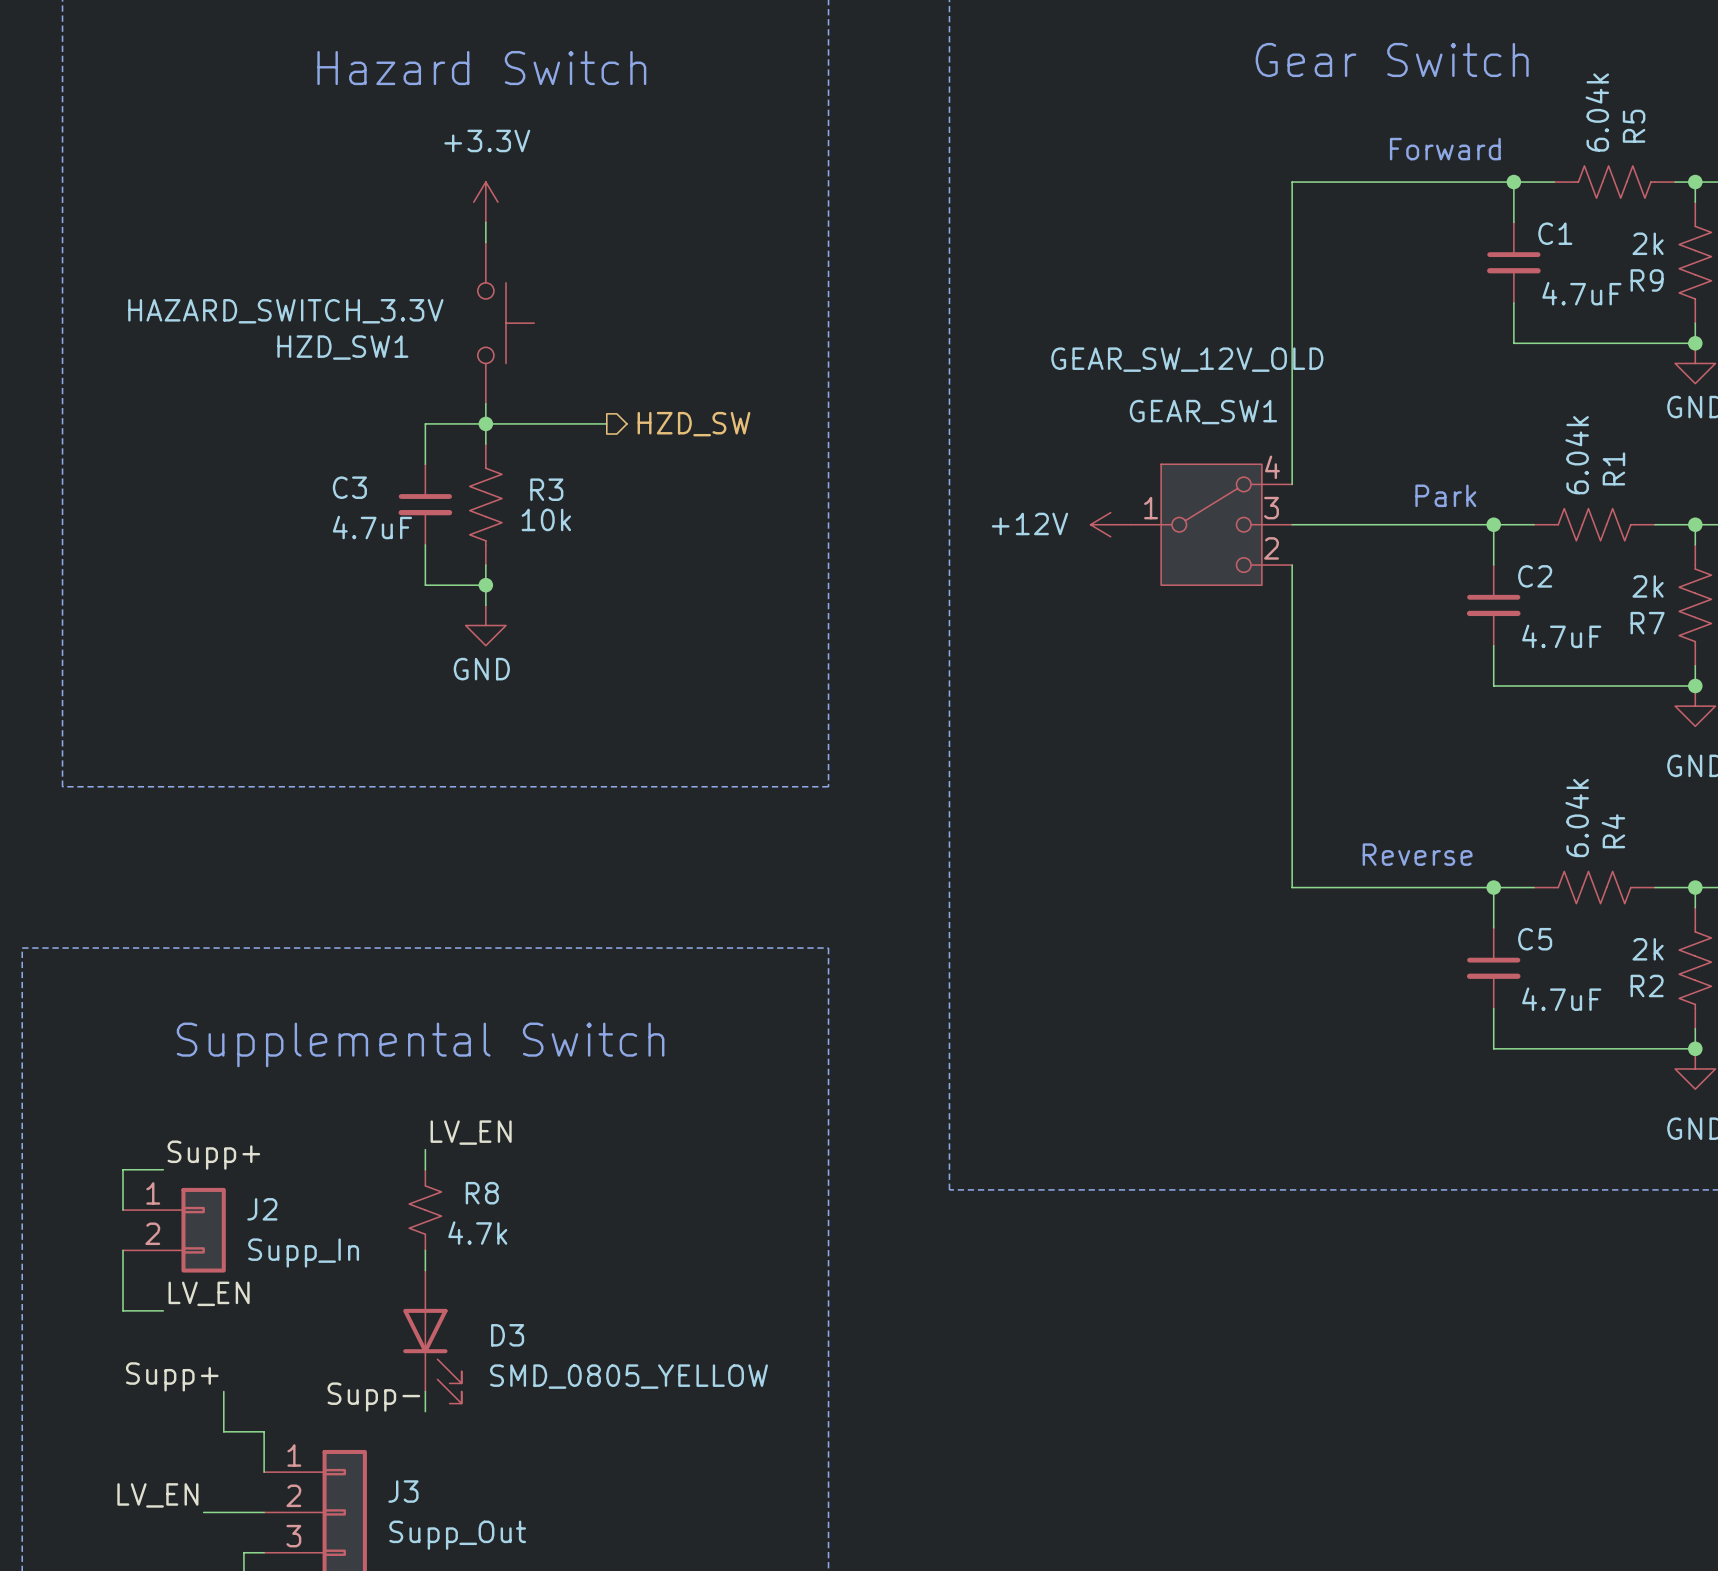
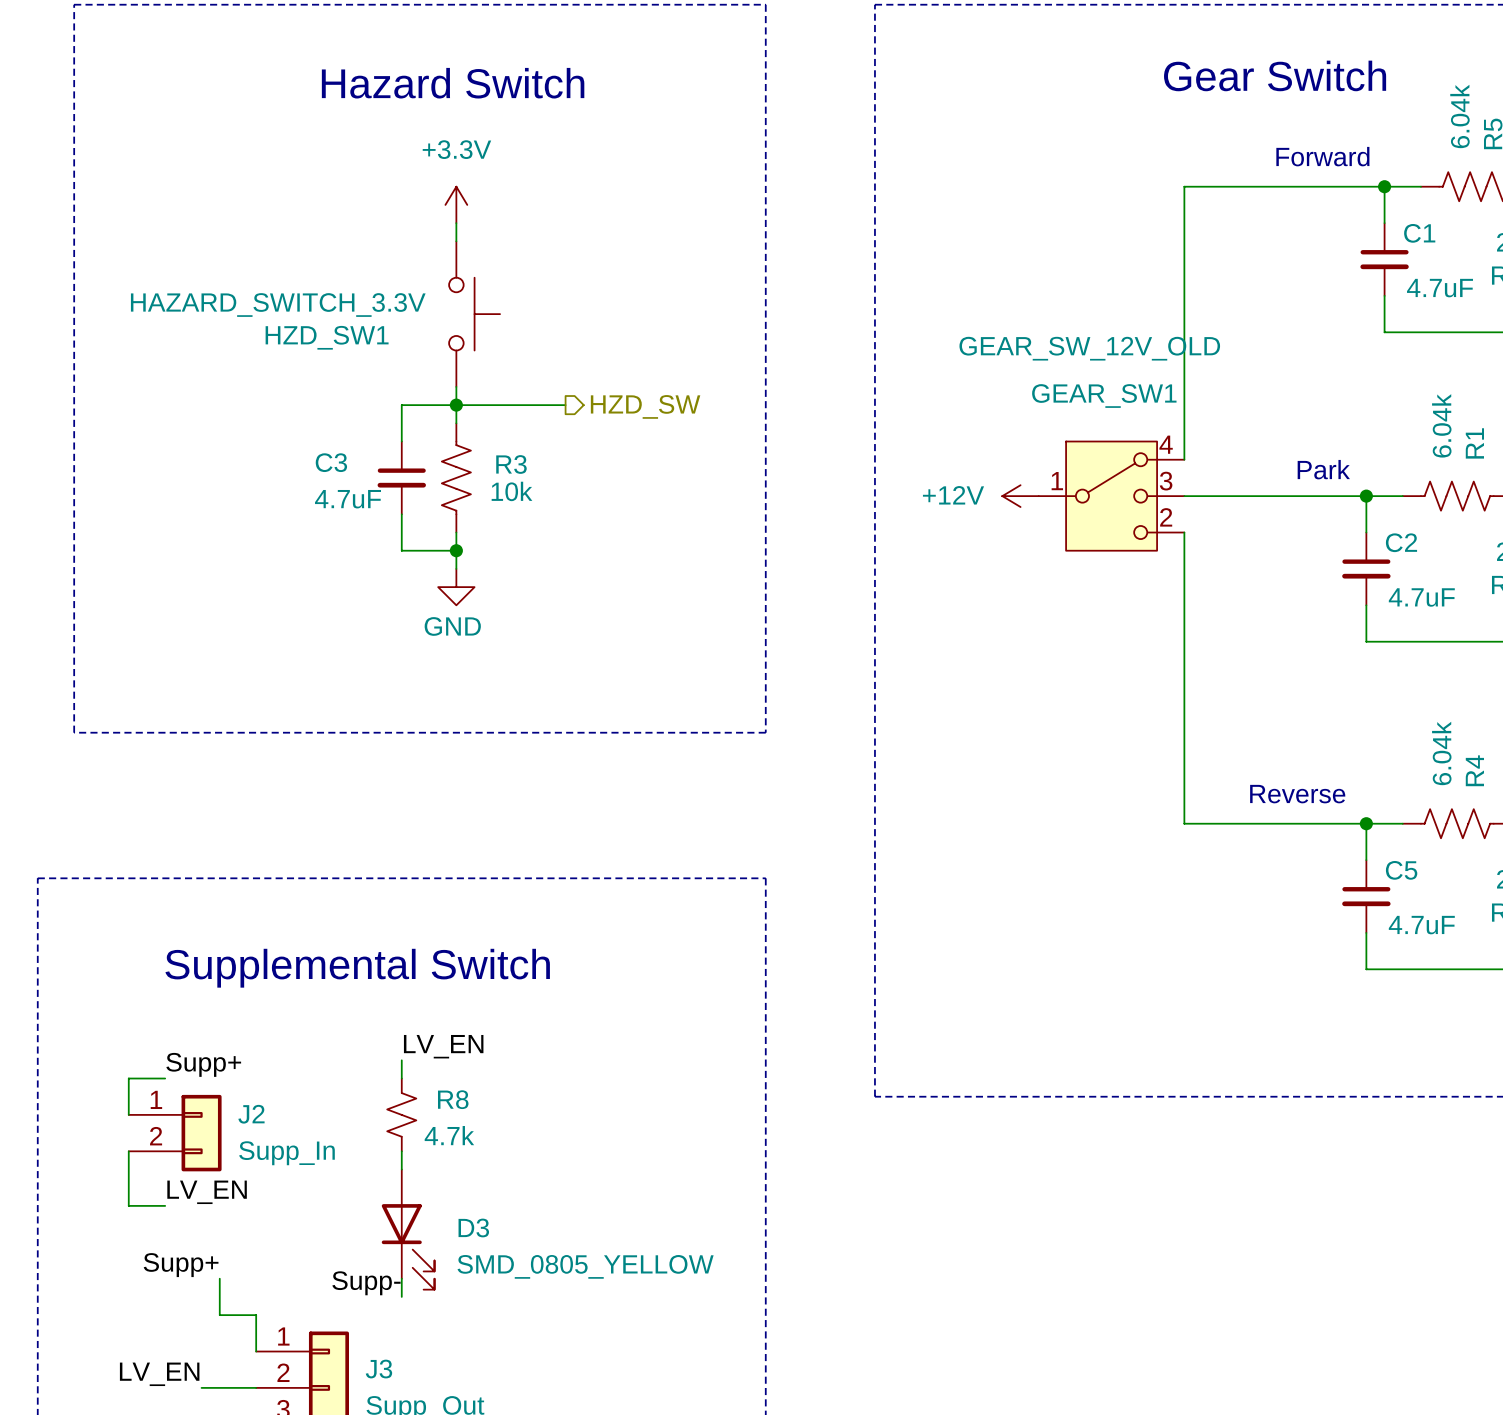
text position: Supplemental Switch (420, 1044) -> Supplemental Switch (357, 968)

